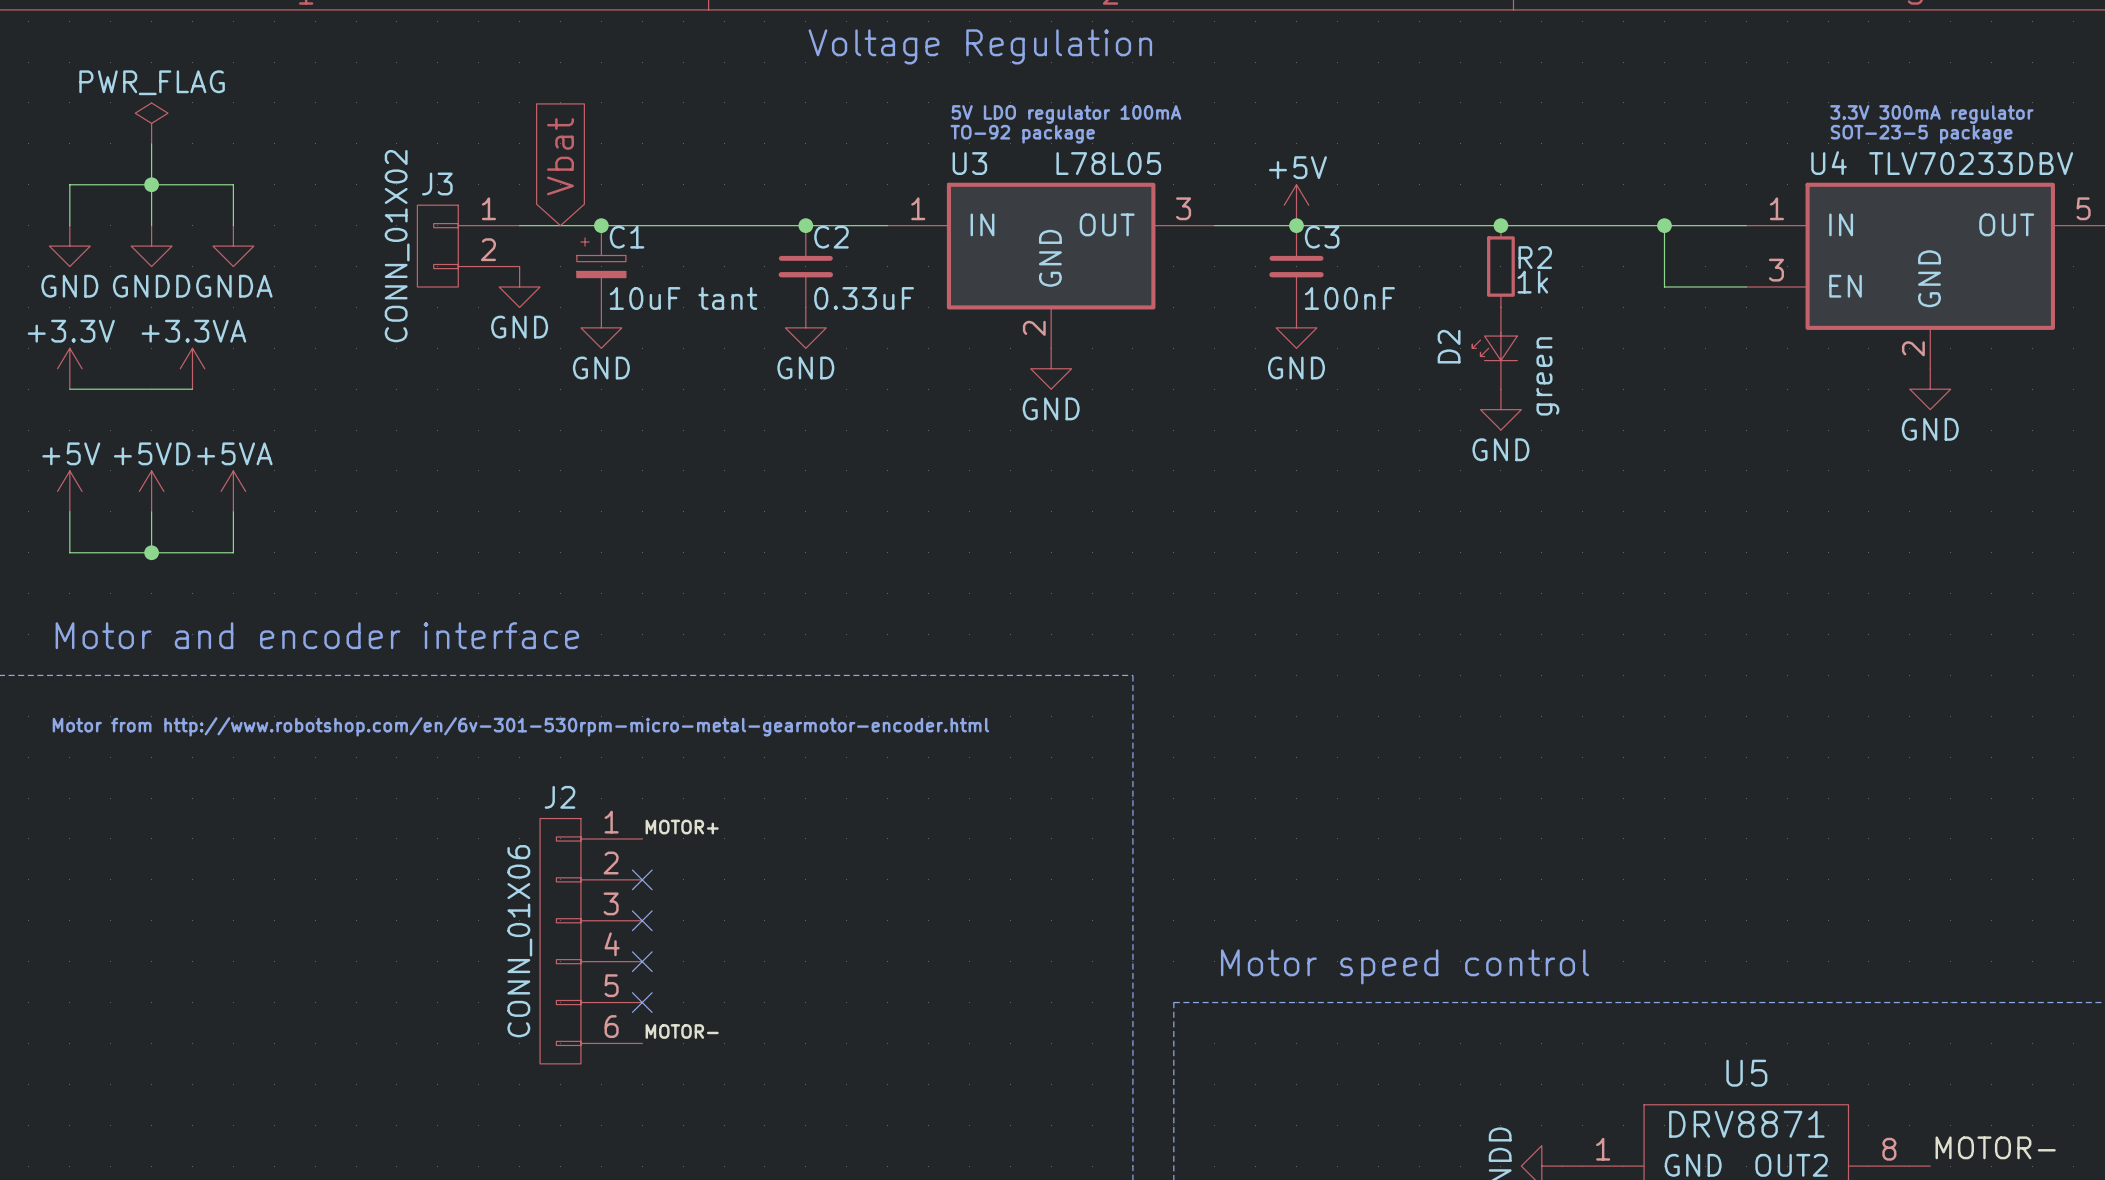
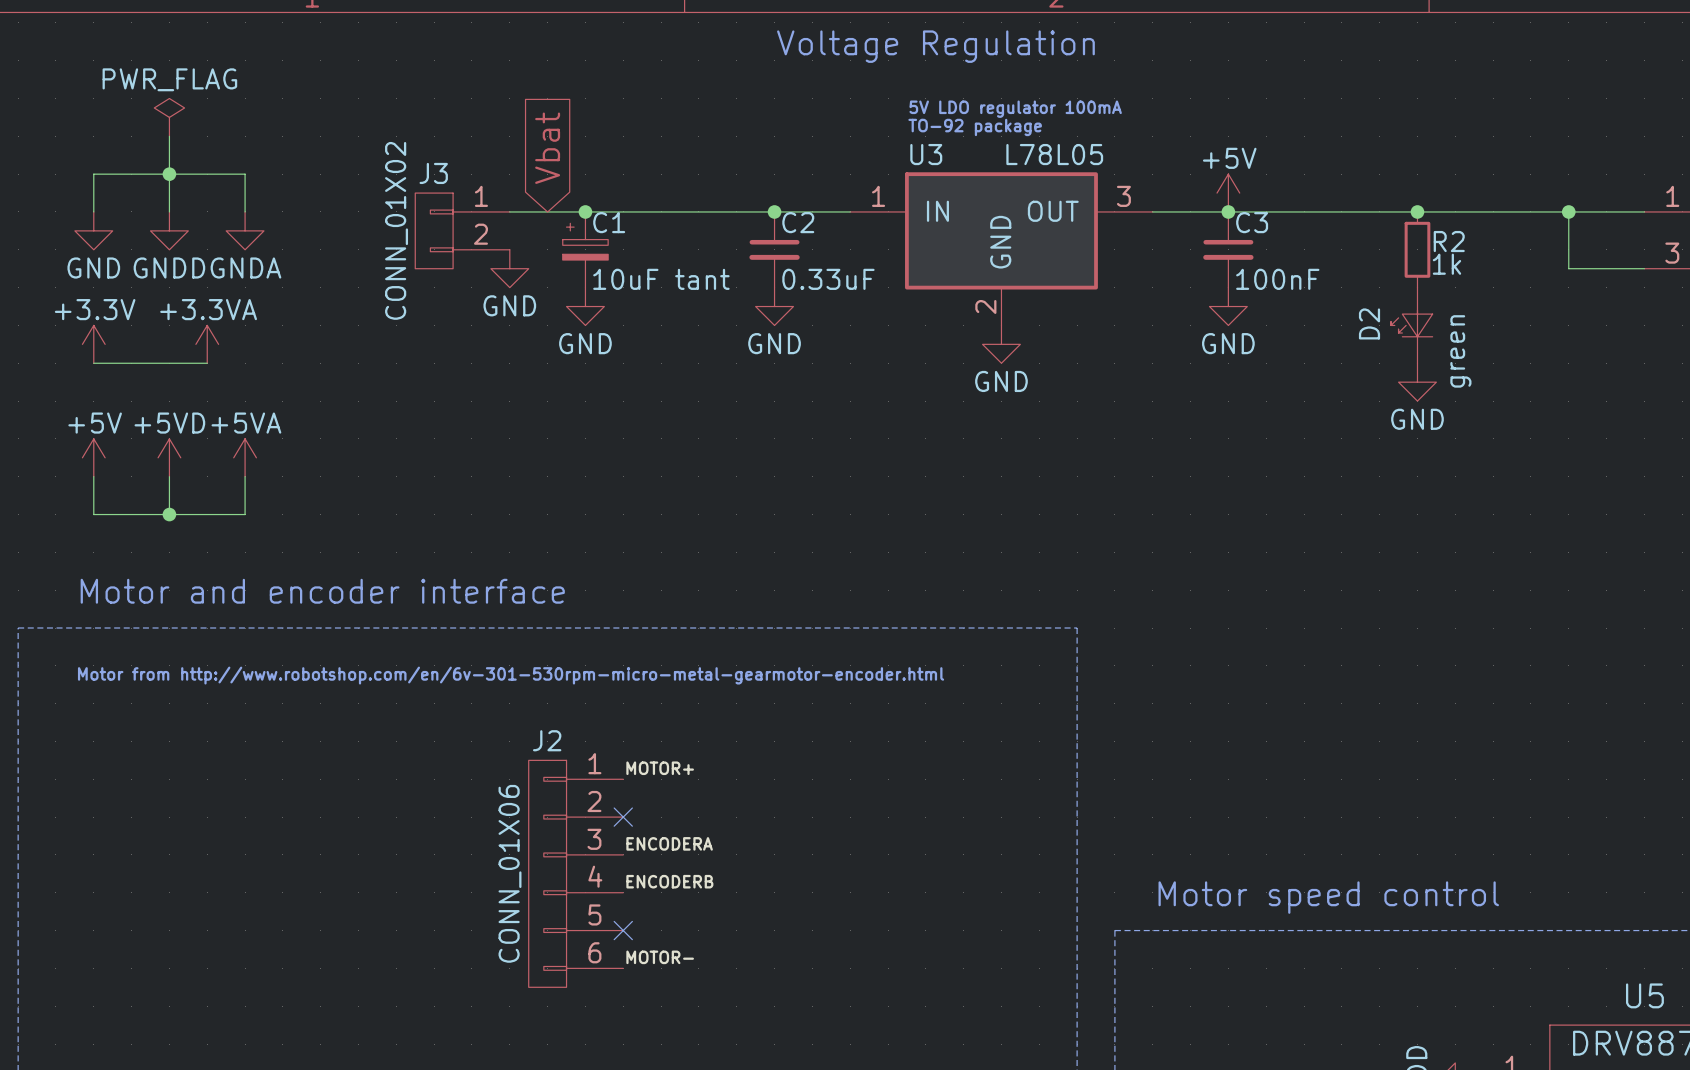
label: none -> ENCODERA (669, 843)
no-connect mark: (642, 920) -> none
label: none -> ENCODERB (669, 881)
no-connect mark: (642, 961) -> none

